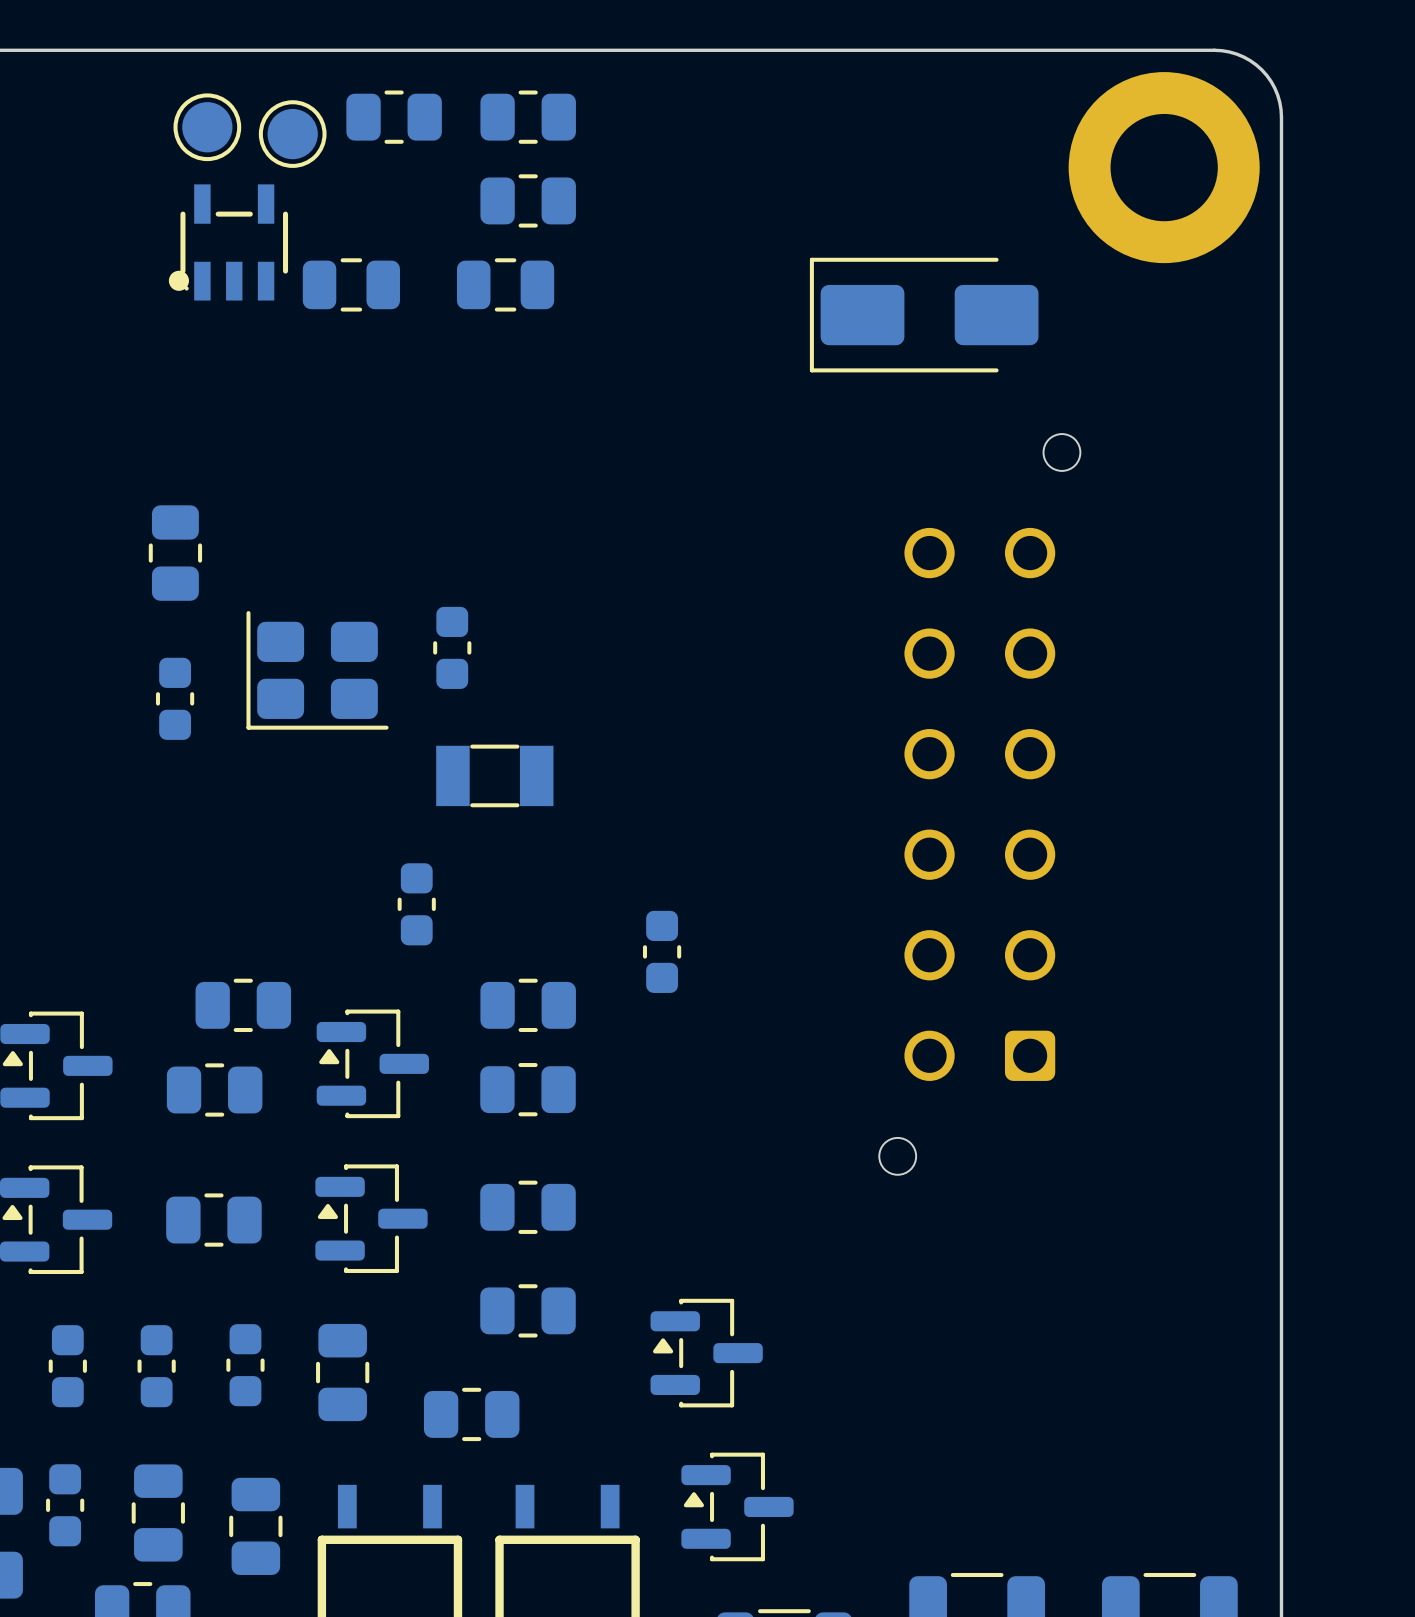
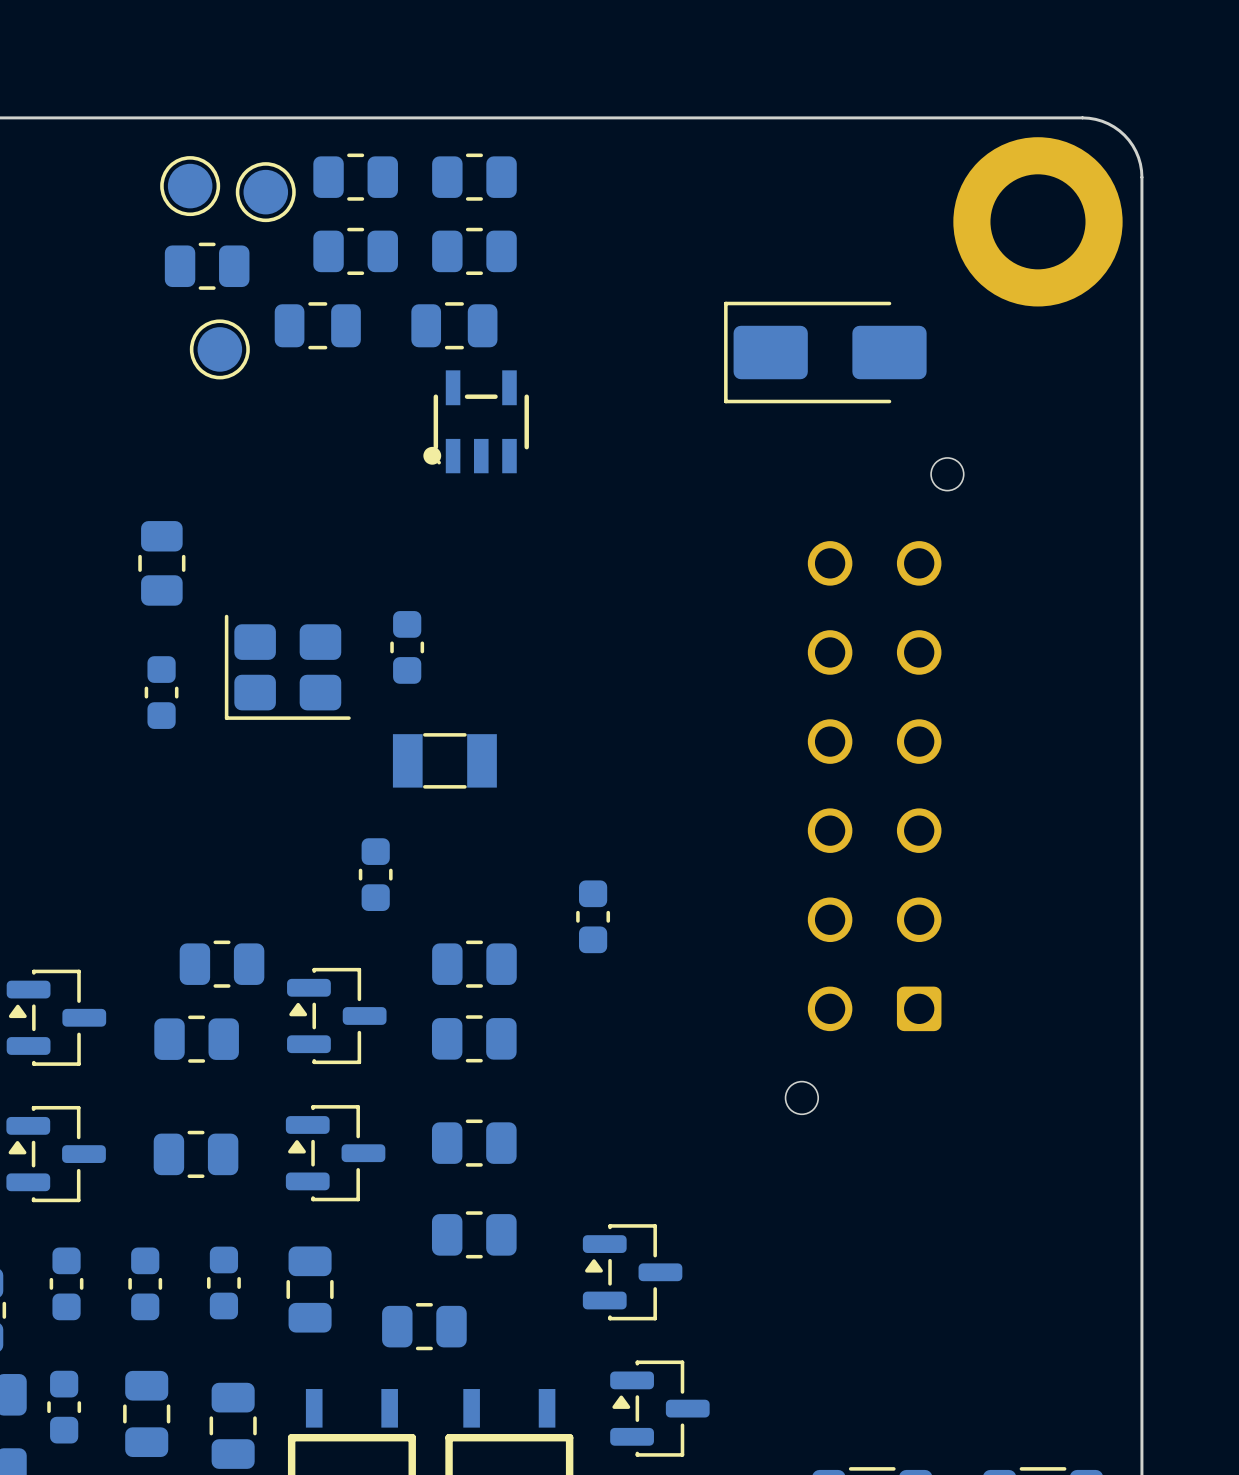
part footprint: [168, 184, 289, 301] -> [164, 242, 250, 290]
part: none -> (355, 251)
part: none -> (219, 349)
part: none -> (476, 421)

